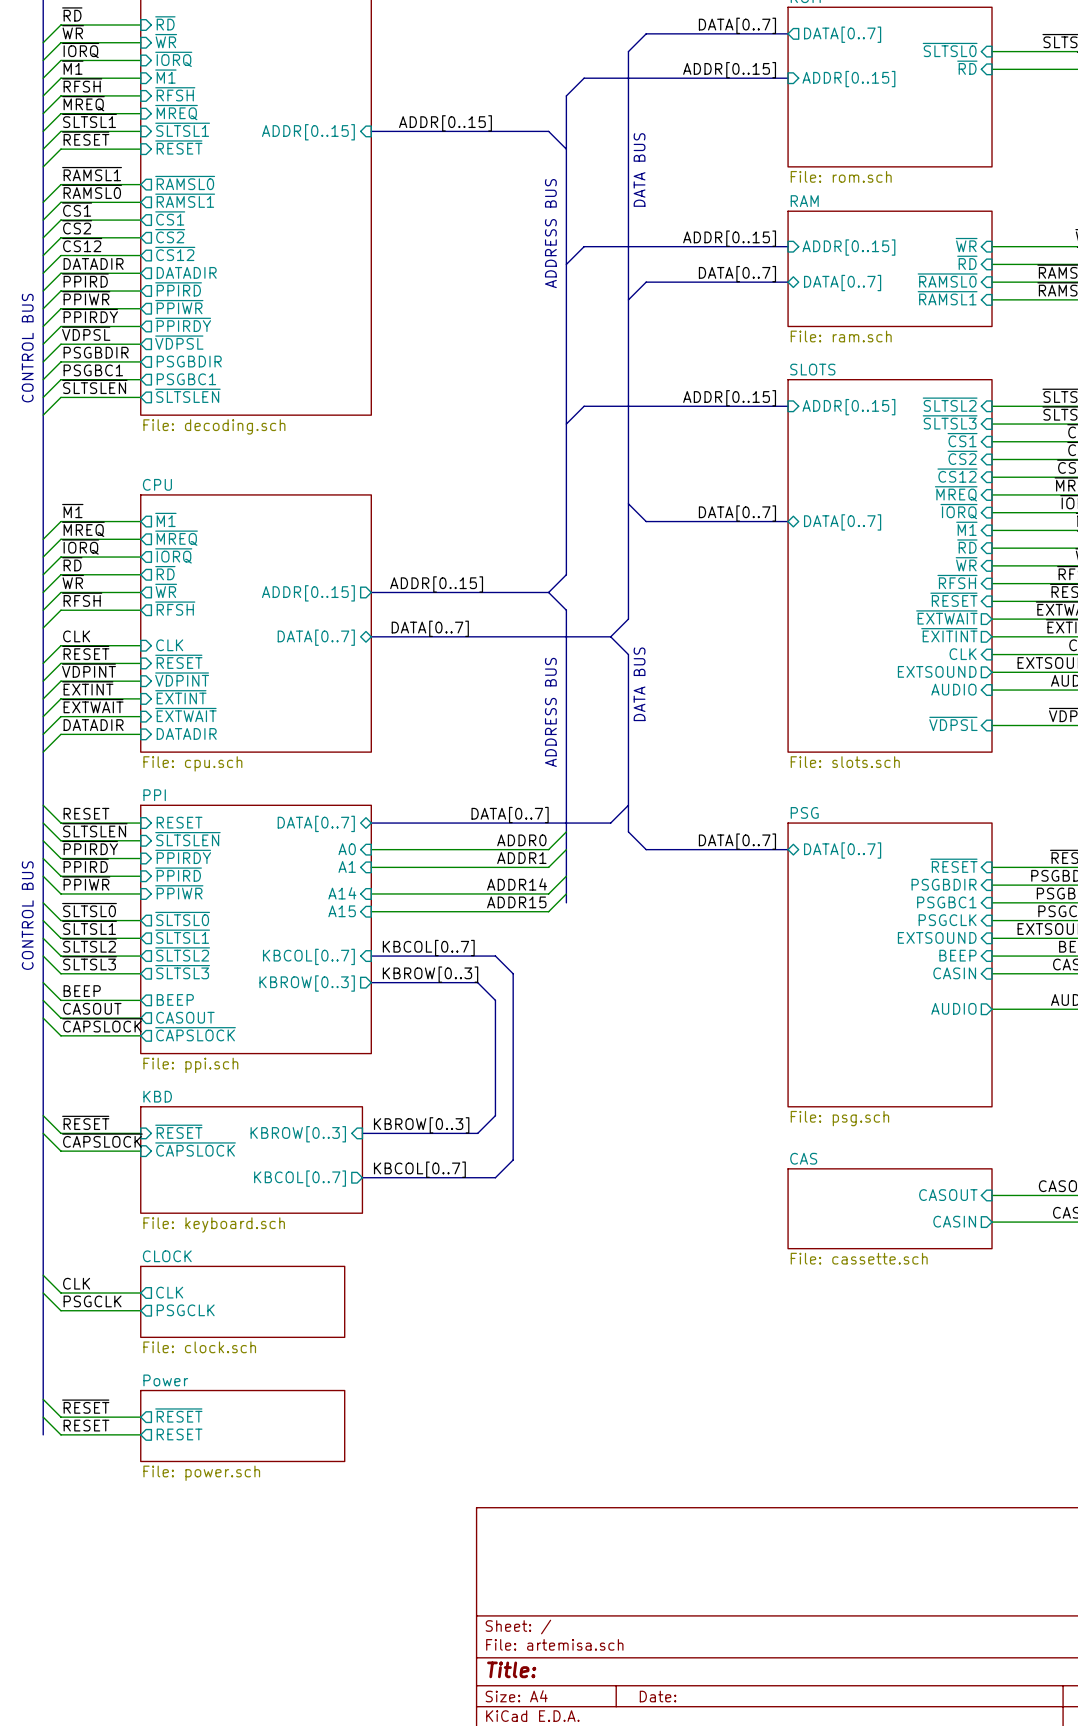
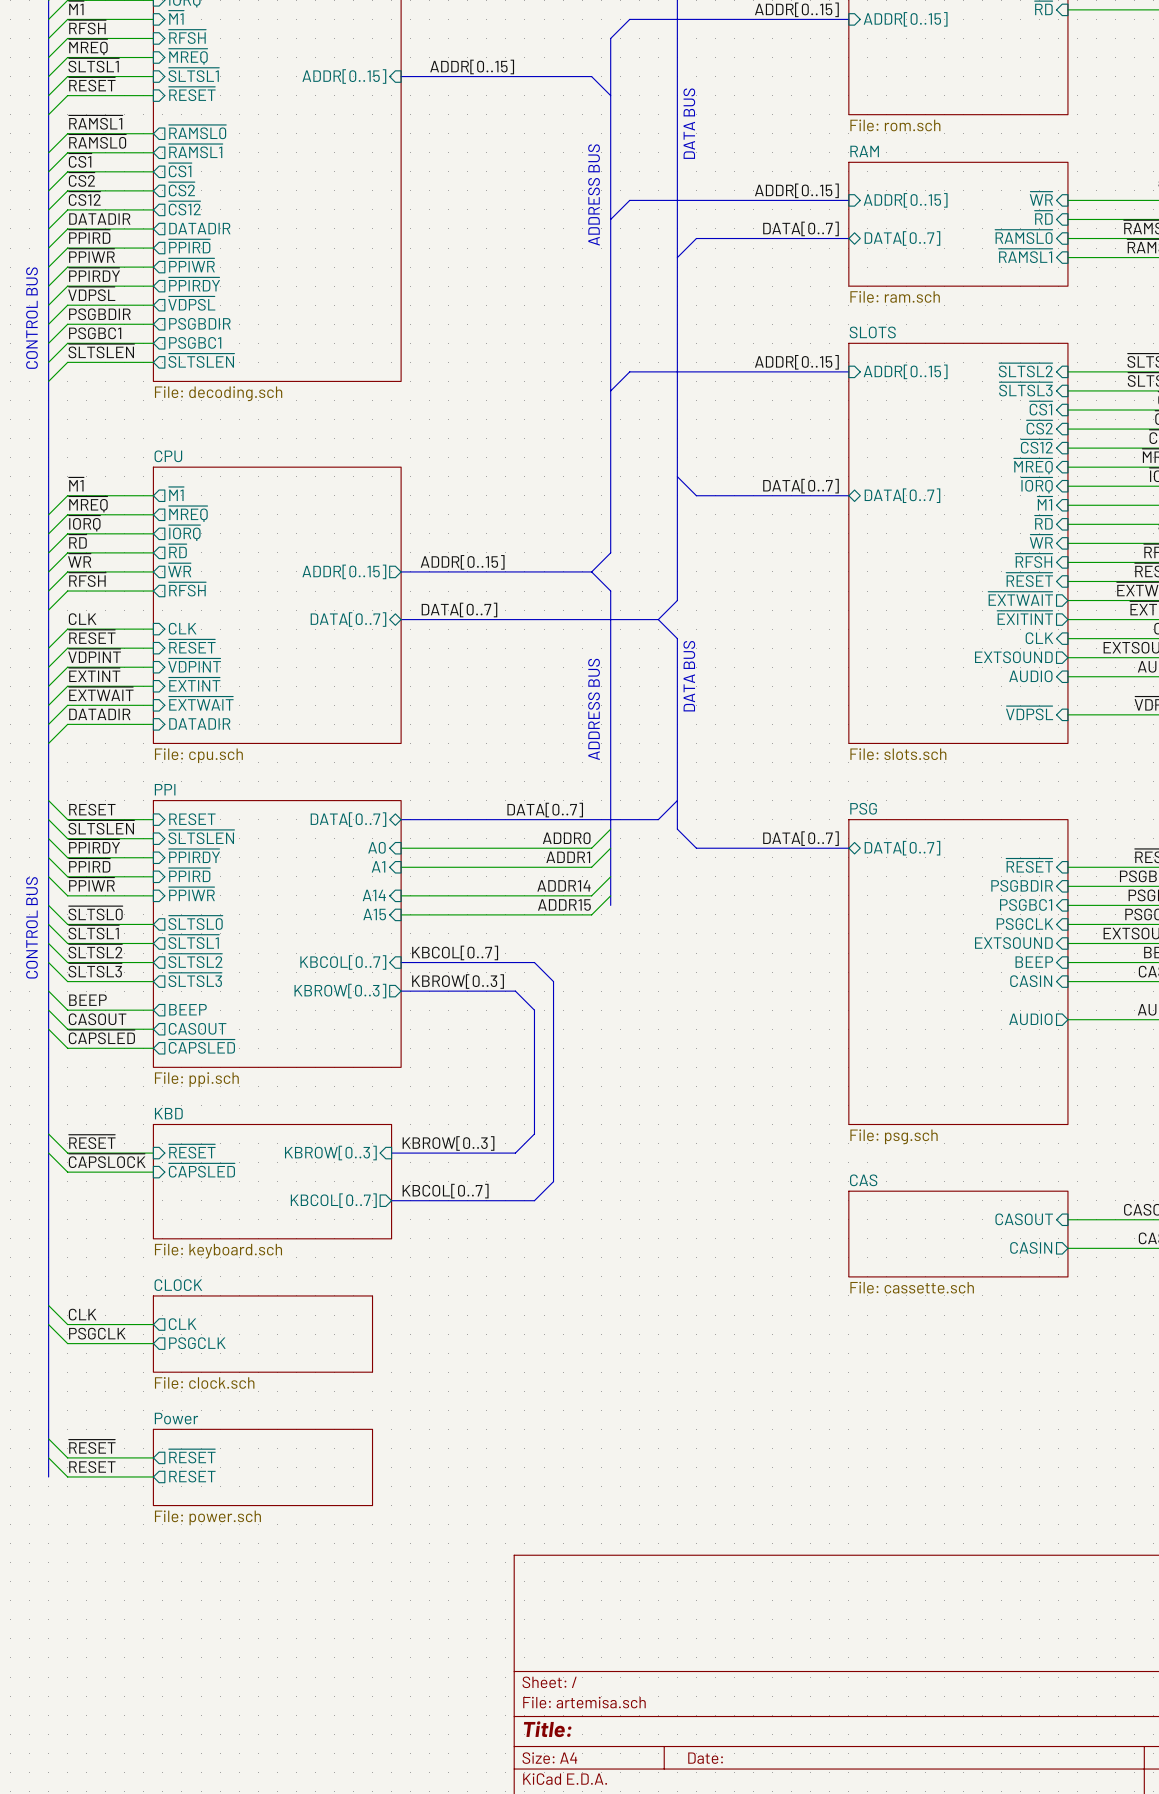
label: ~{CAPSLOCK} (102, 1025) -> ~{CAPSLED} (101, 1037)
sheet pin: ~{CAPSLOCK} (195, 1034) -> ~{CAPSLED} (201, 1046)
sheet pin: ~{CAPSLOCK} (195, 1149) -> ~{CAPSLED} (201, 1170)

